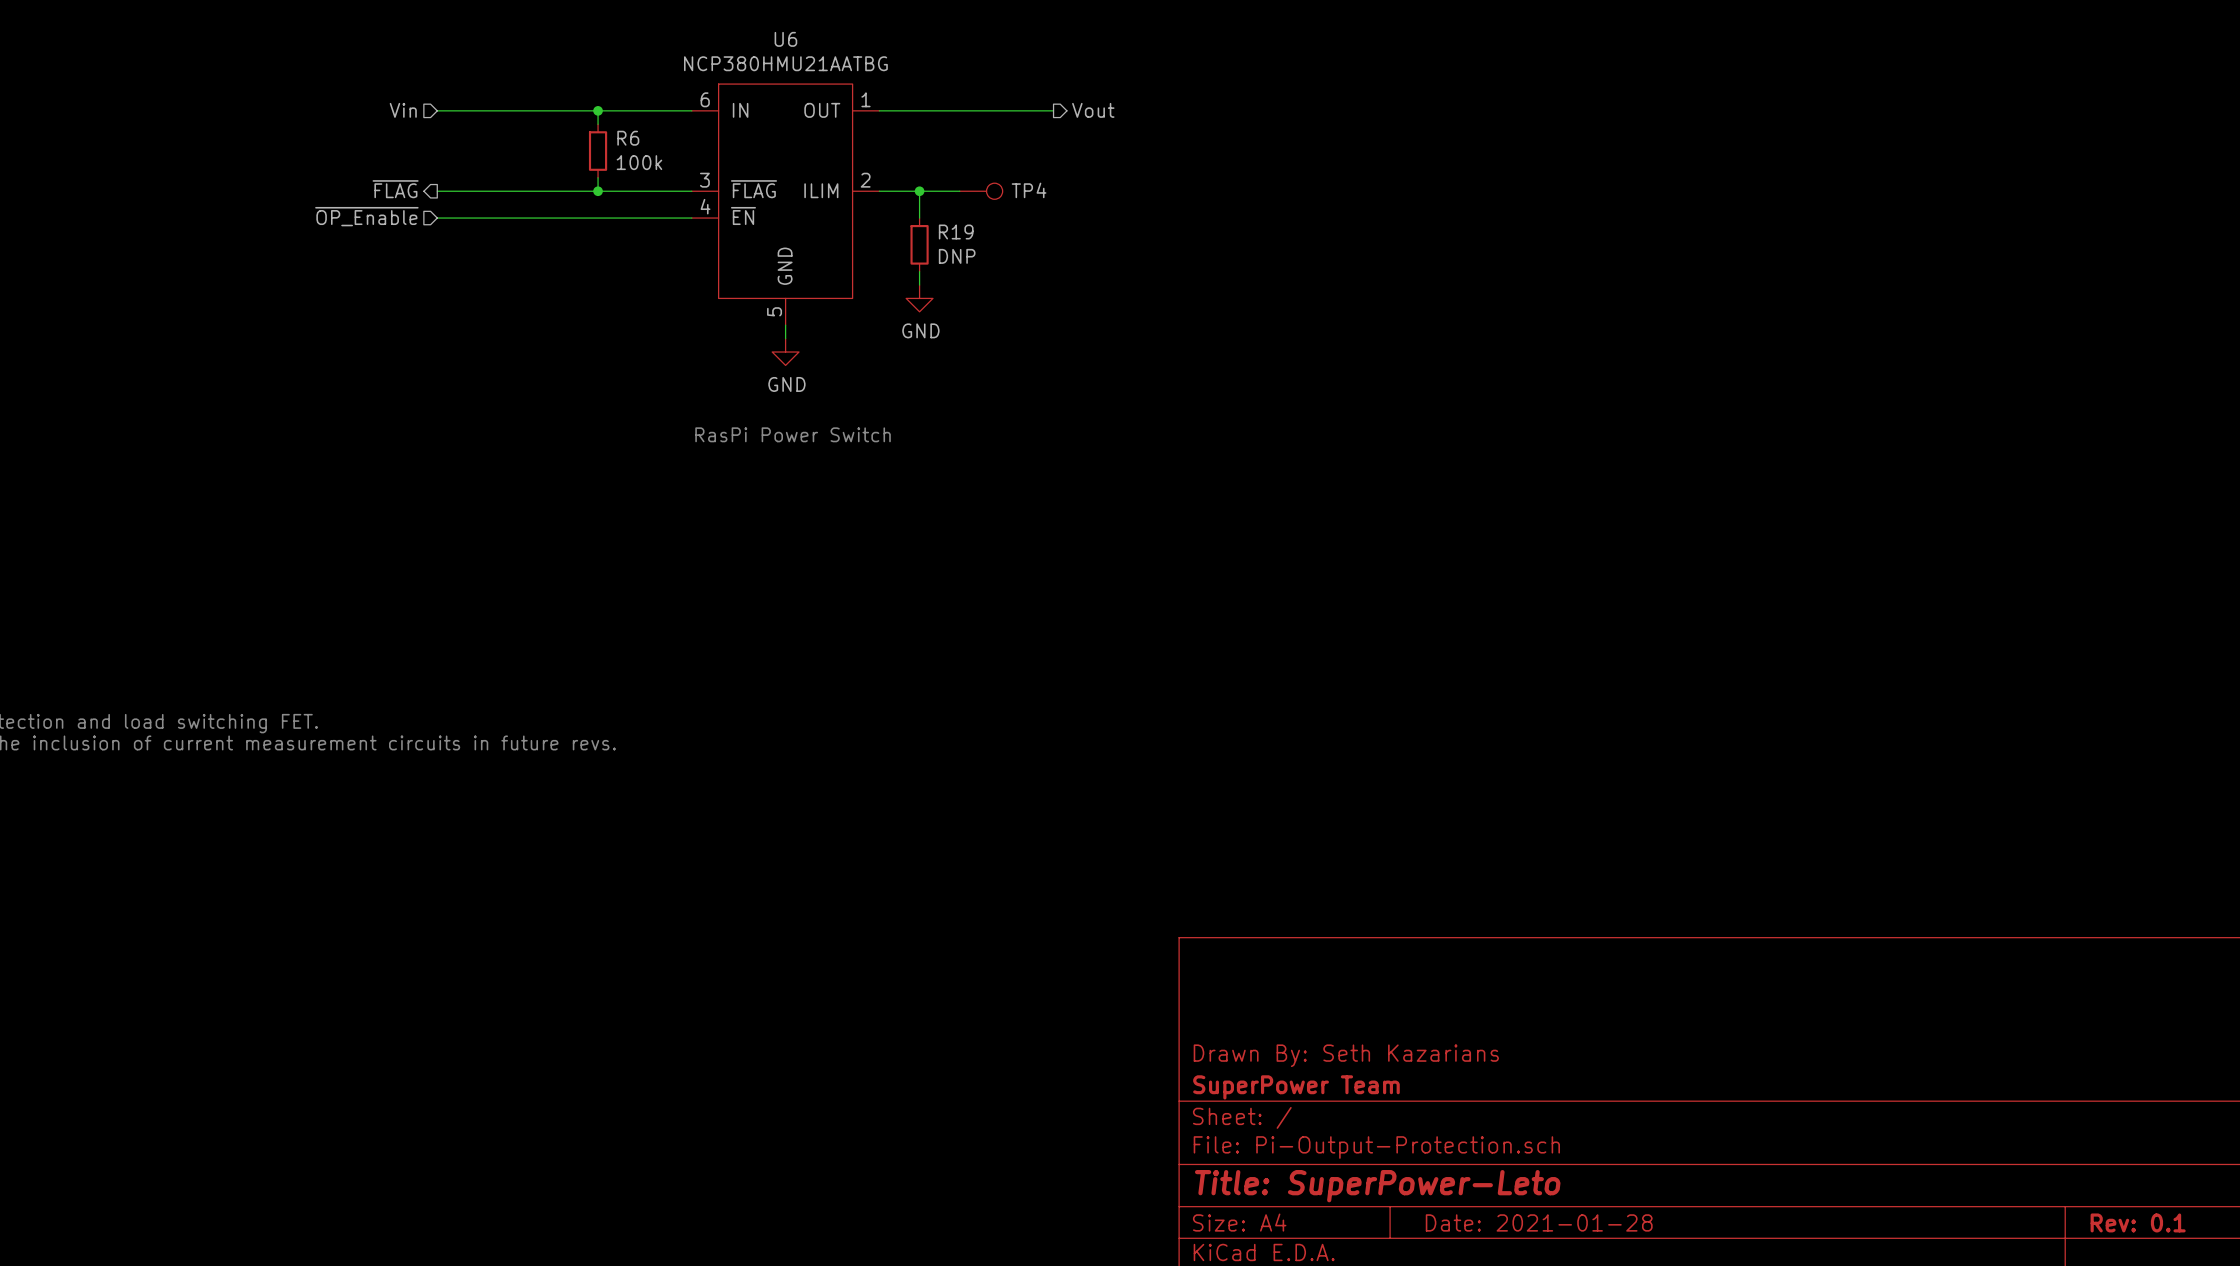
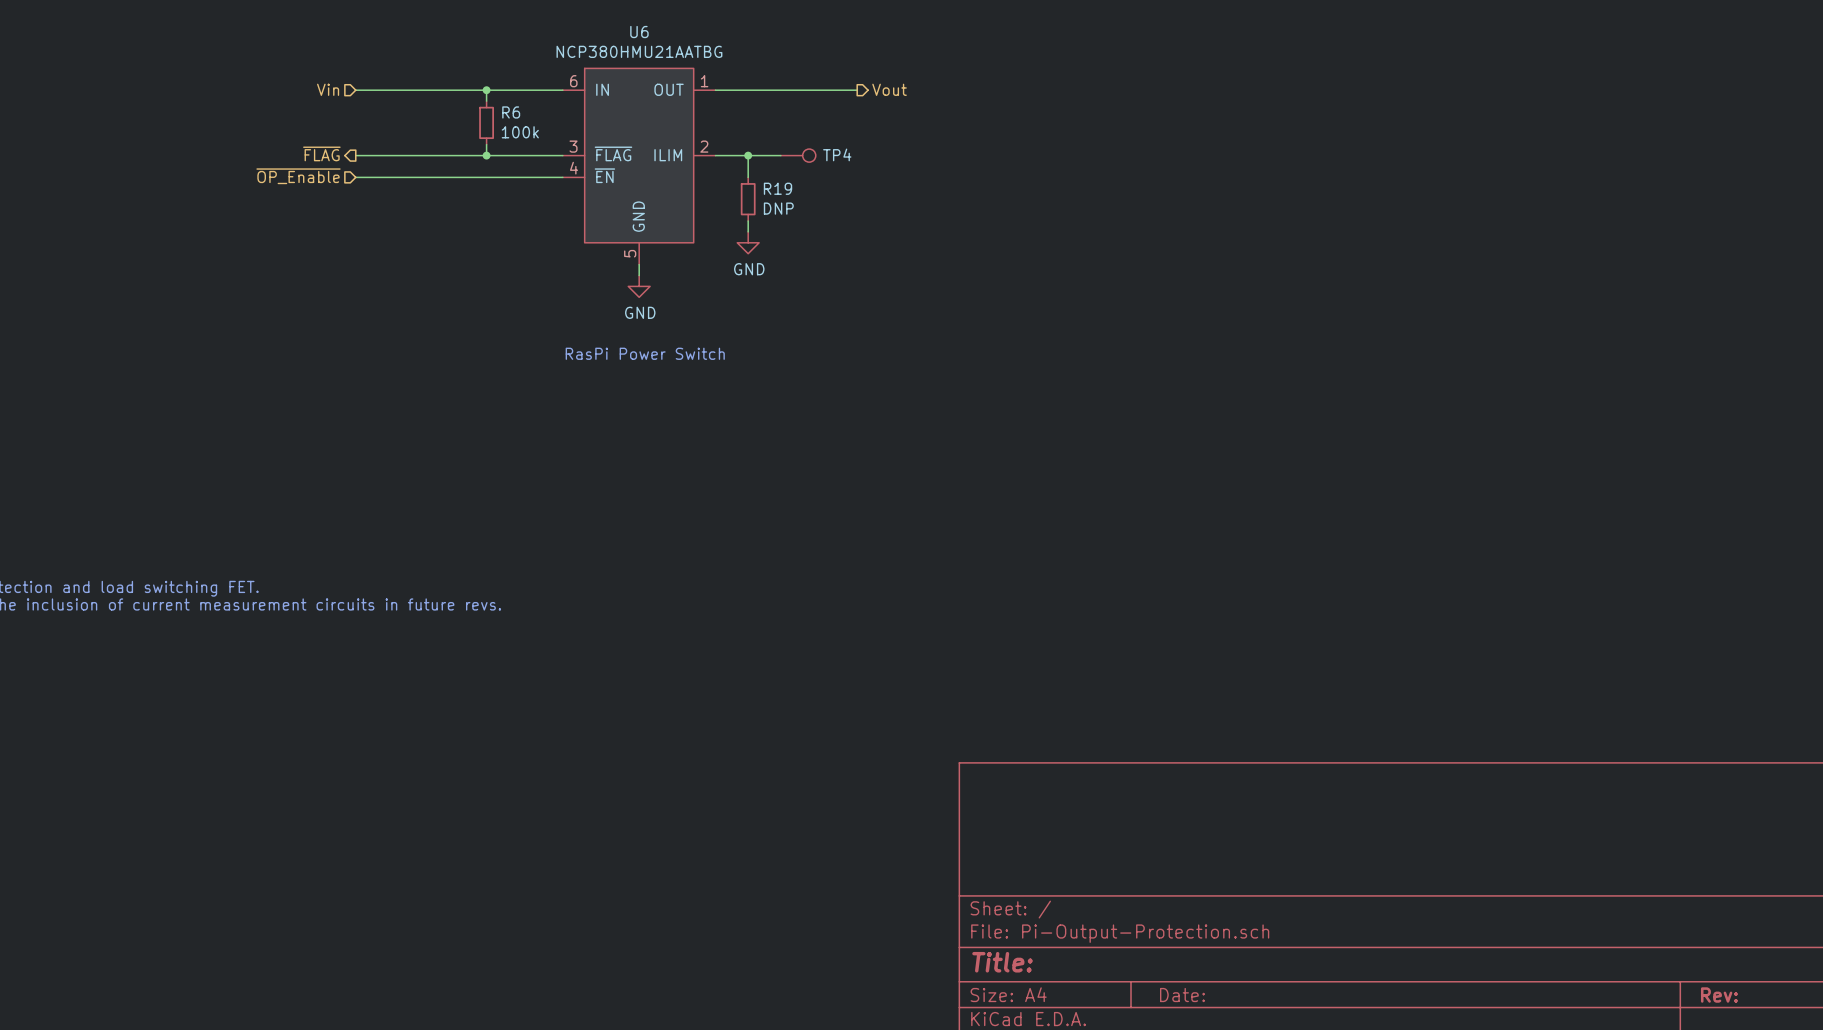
title block: Drawn By: Seth Kazarians (1346, 1055) -> none
title block: SuperPower Team (1296, 1087) -> none
title block: Title: SuperPower-Leto (1377, 1186) -> Title: (1002, 962)
title block: Date: 2021-01-28 (1539, 1222) -> Date: (1182, 995)
title block: Rev: 0.1 (2138, 1222) -> Rev: (1719, 995)

